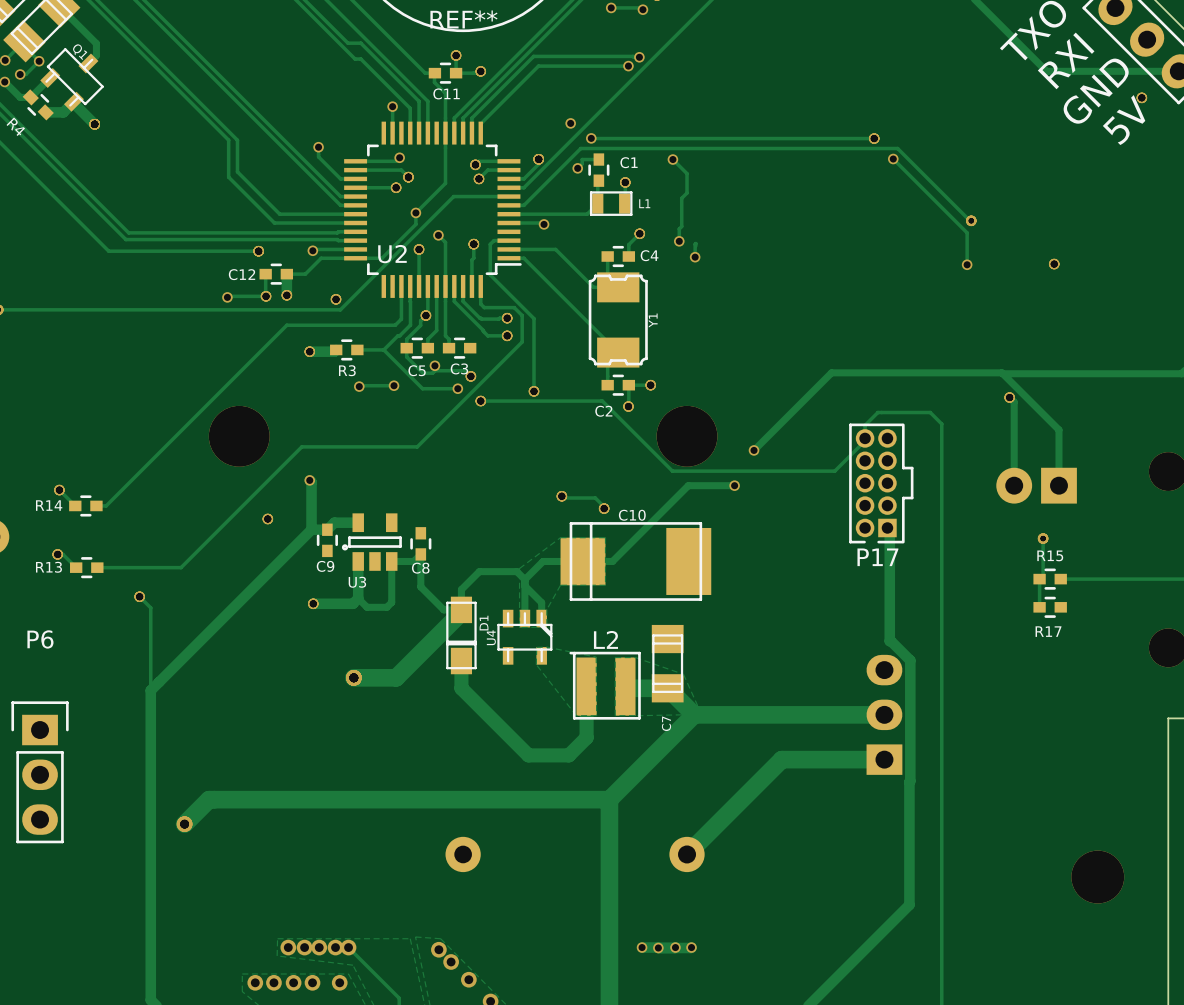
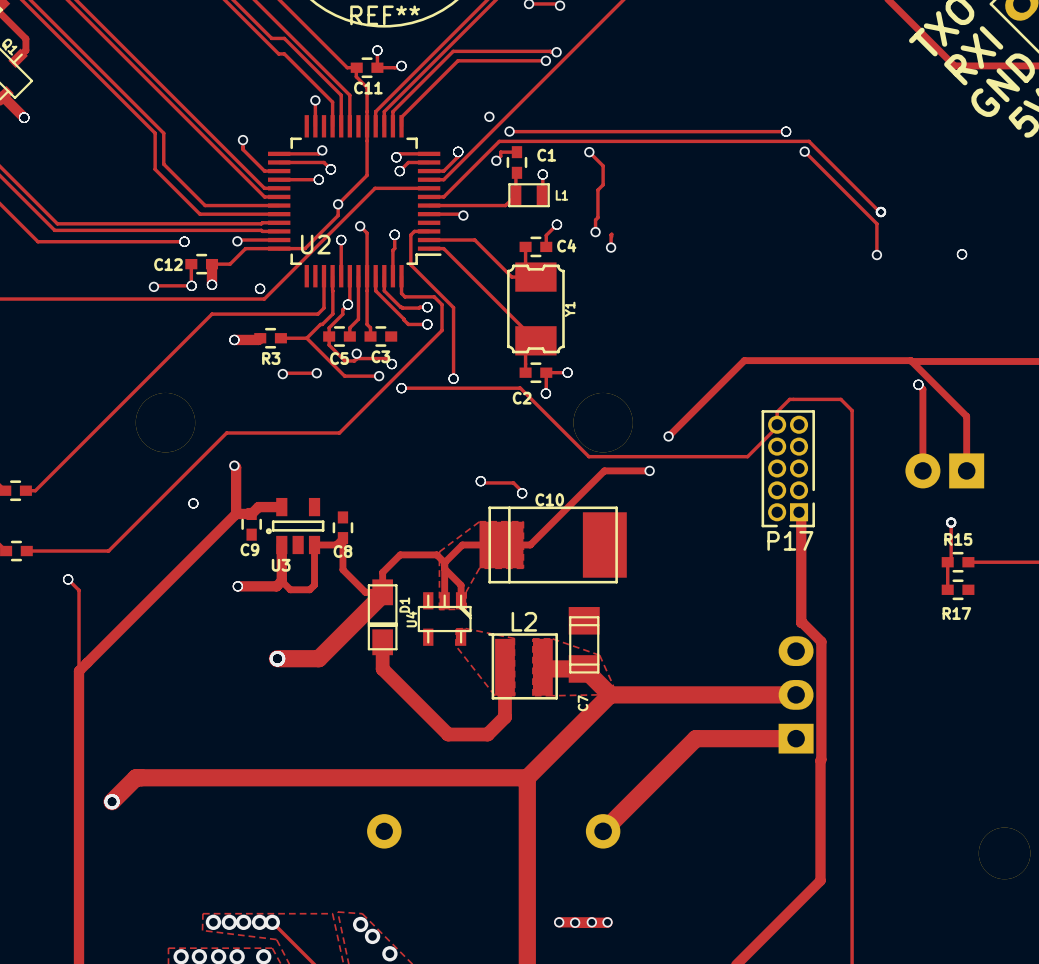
P17 footprint: [849, 423, 914, 544] -> [761, 410, 815, 528]

